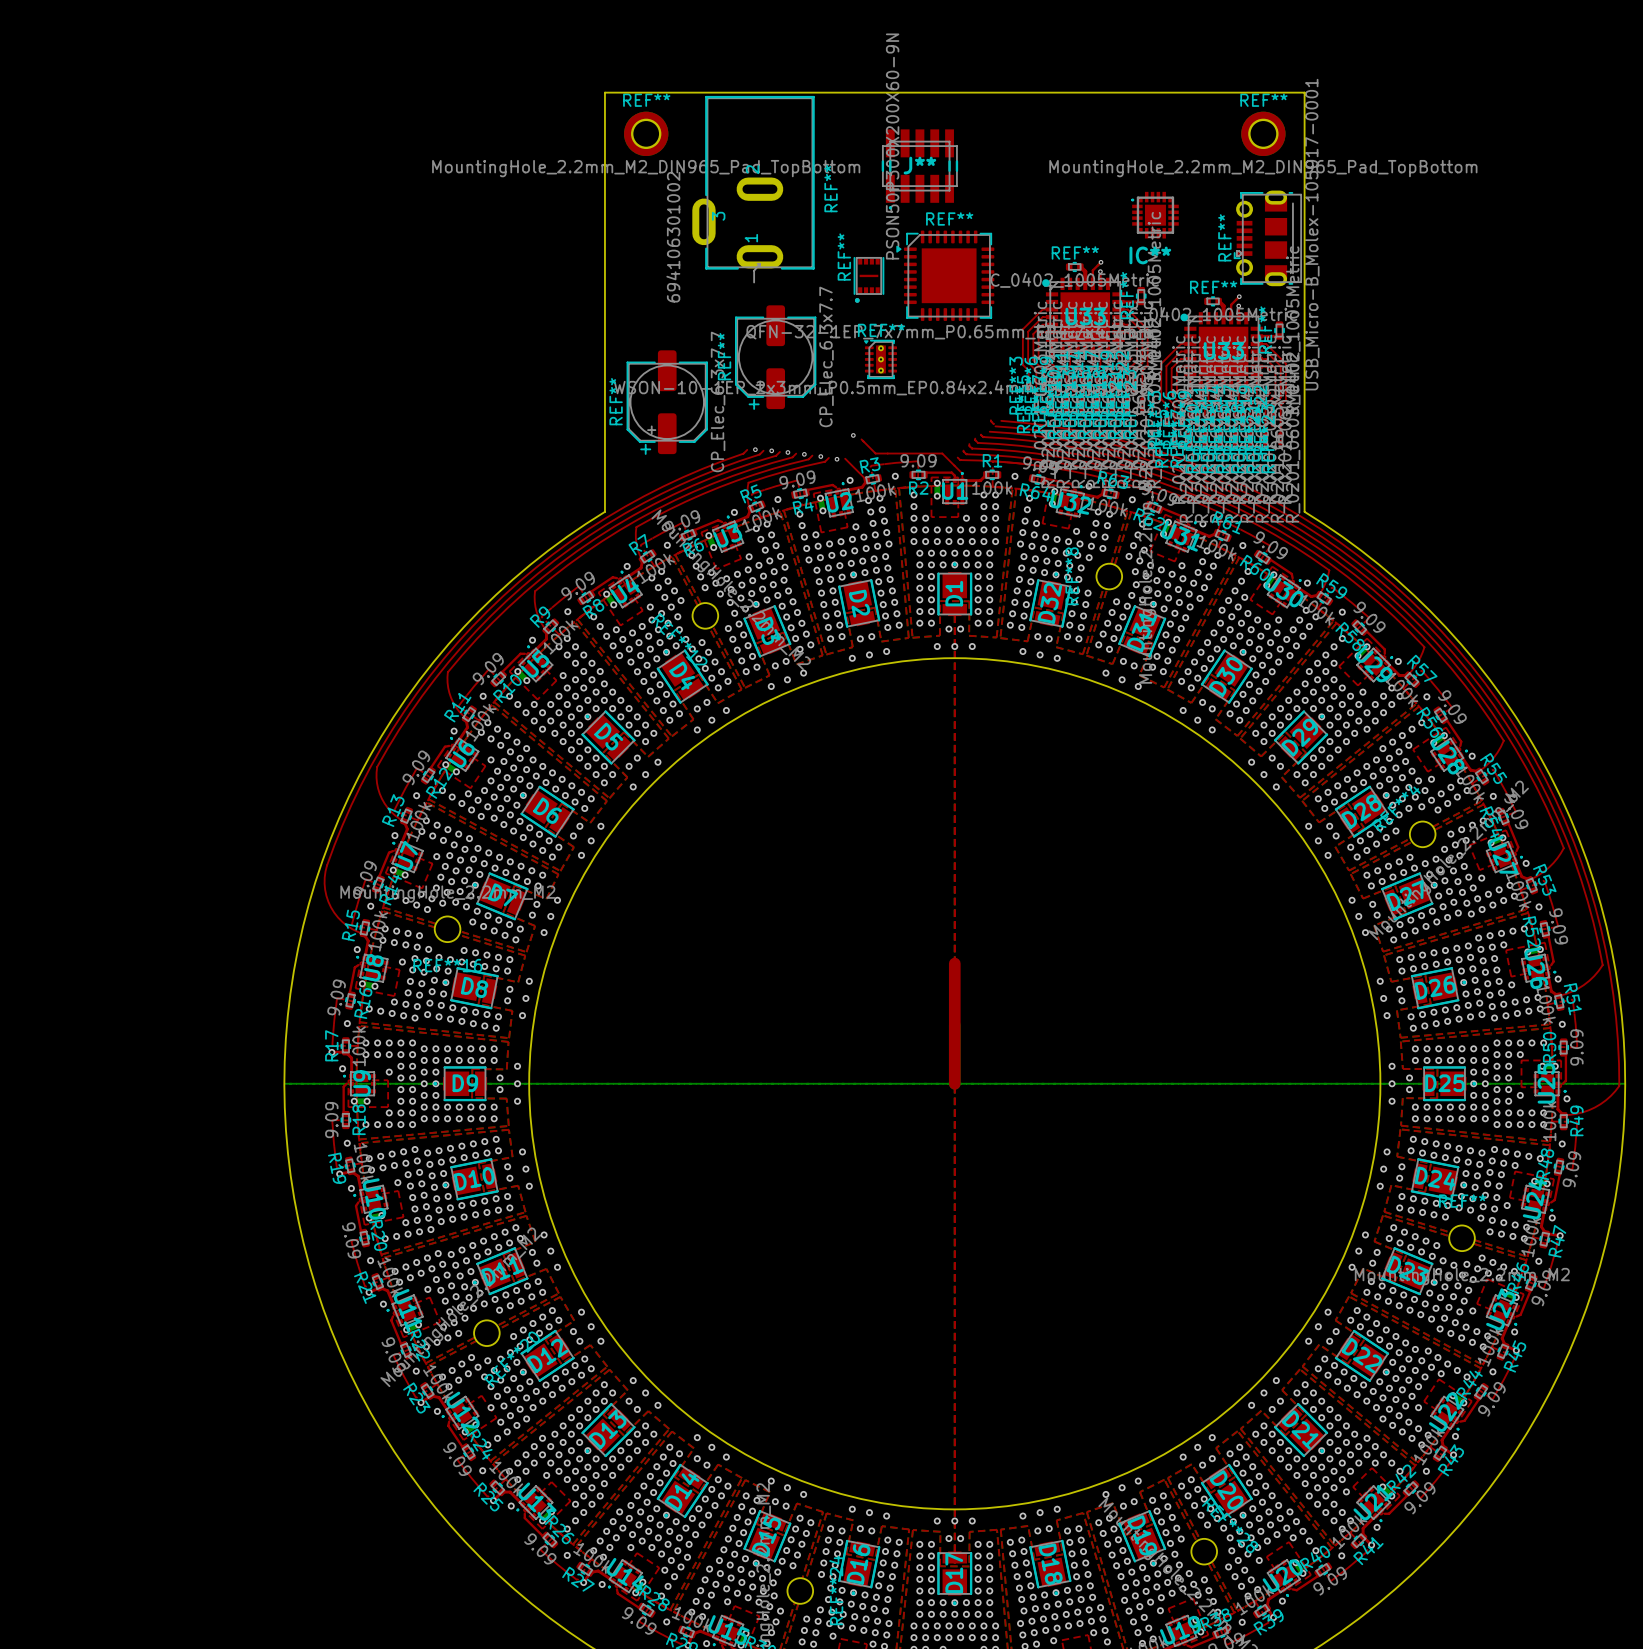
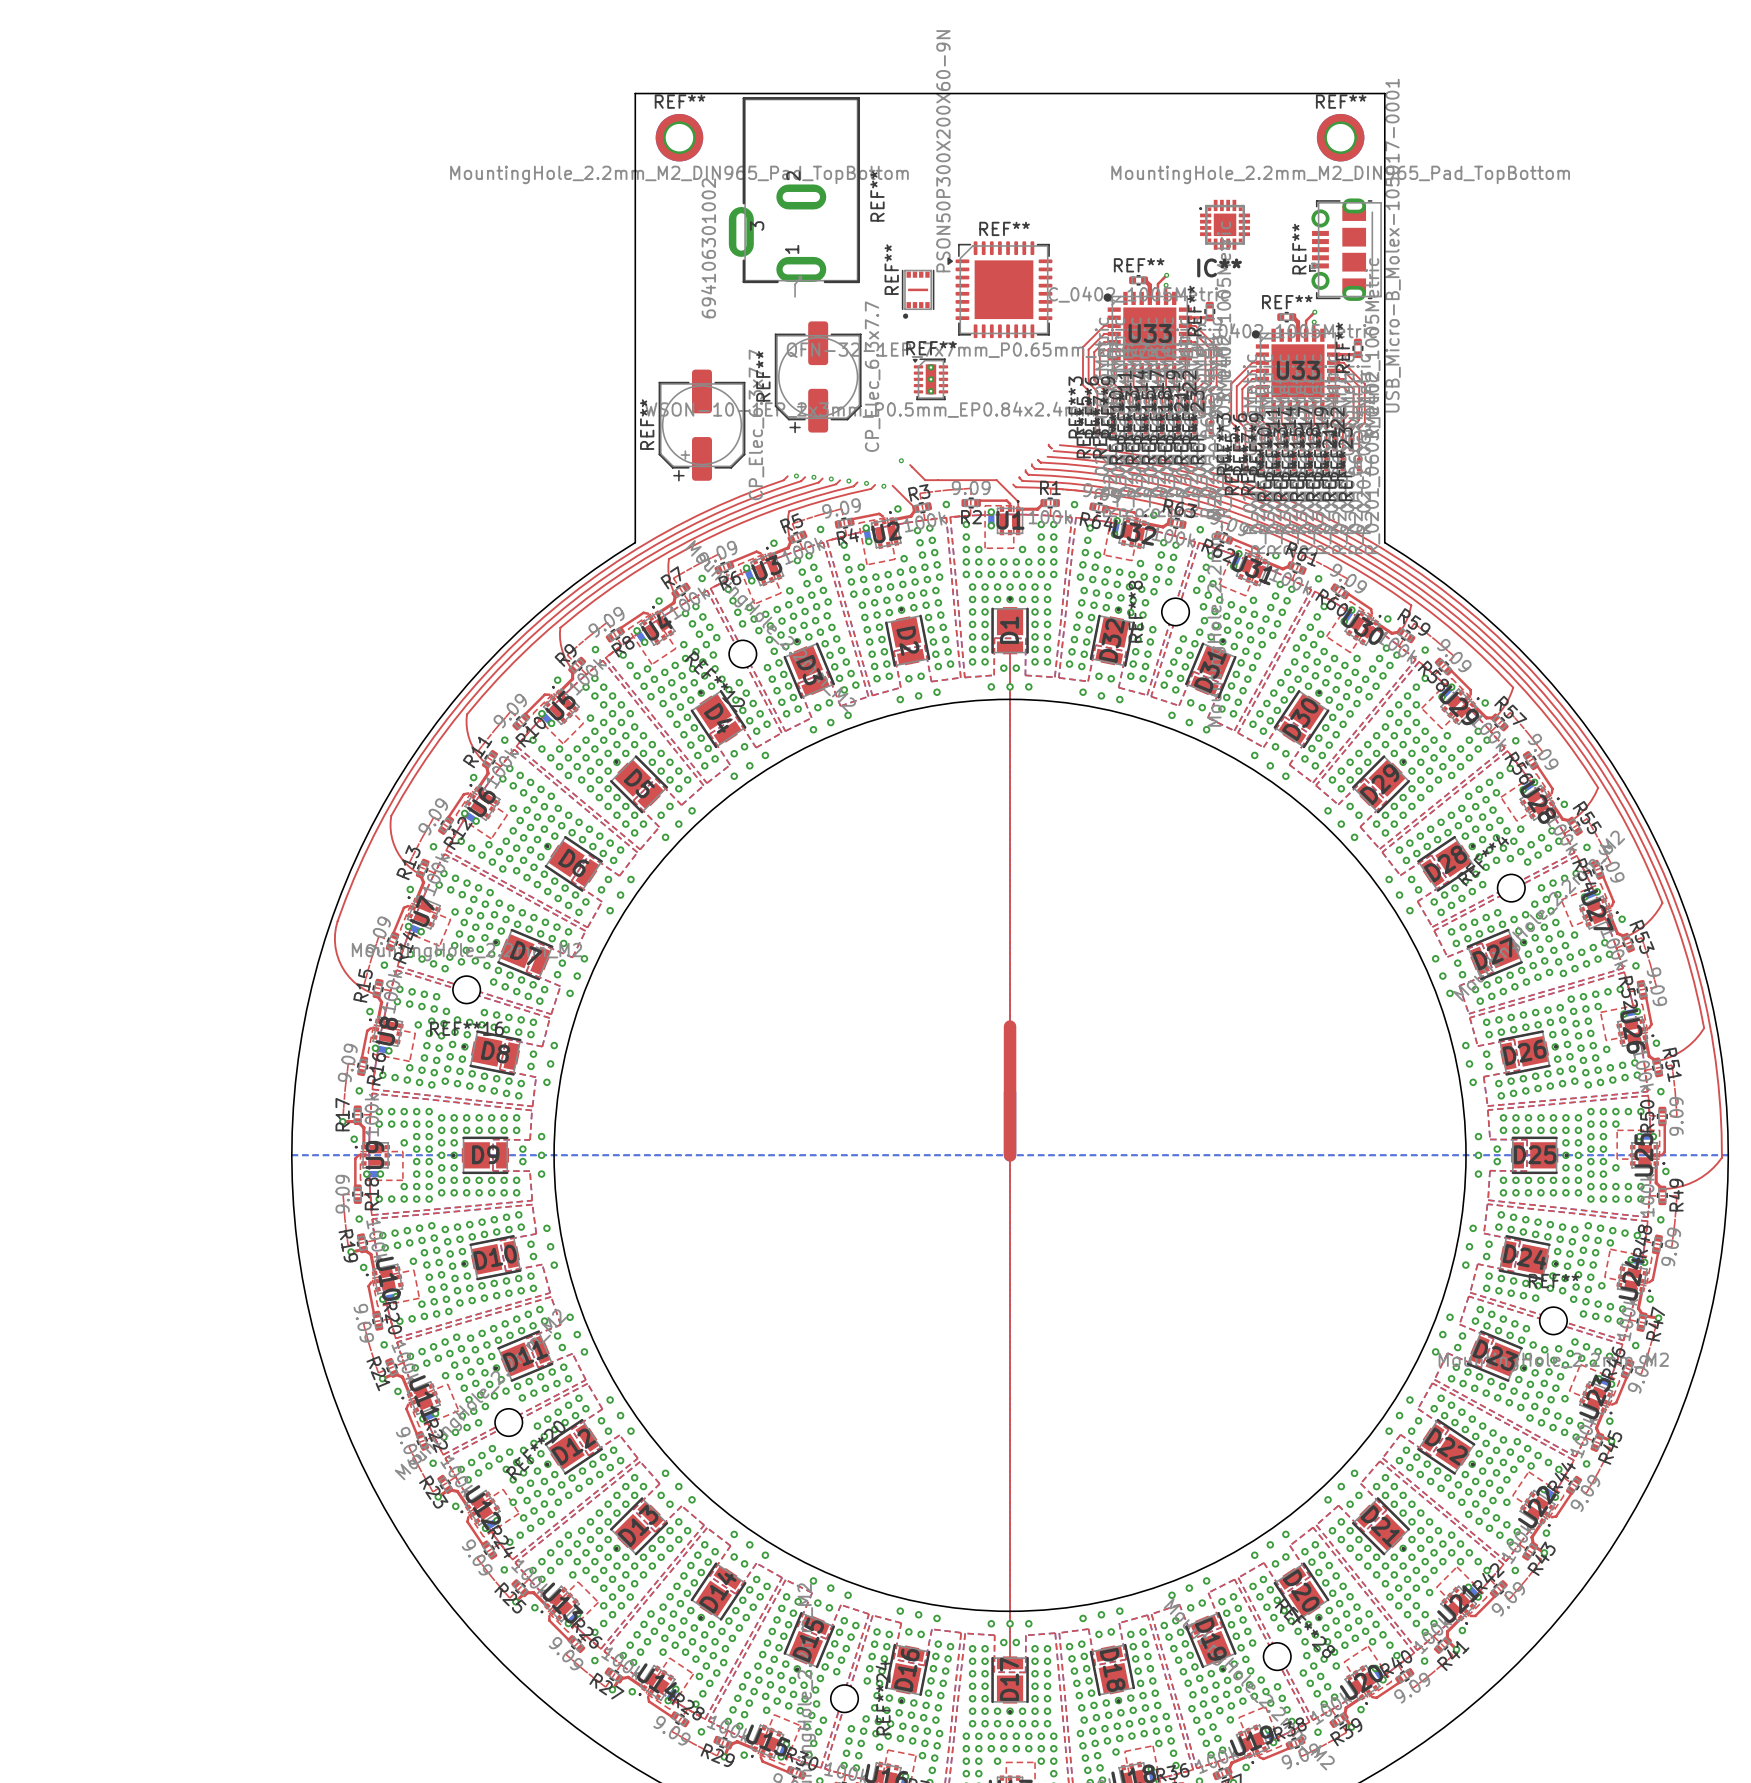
J**: (919, 169) -> none

